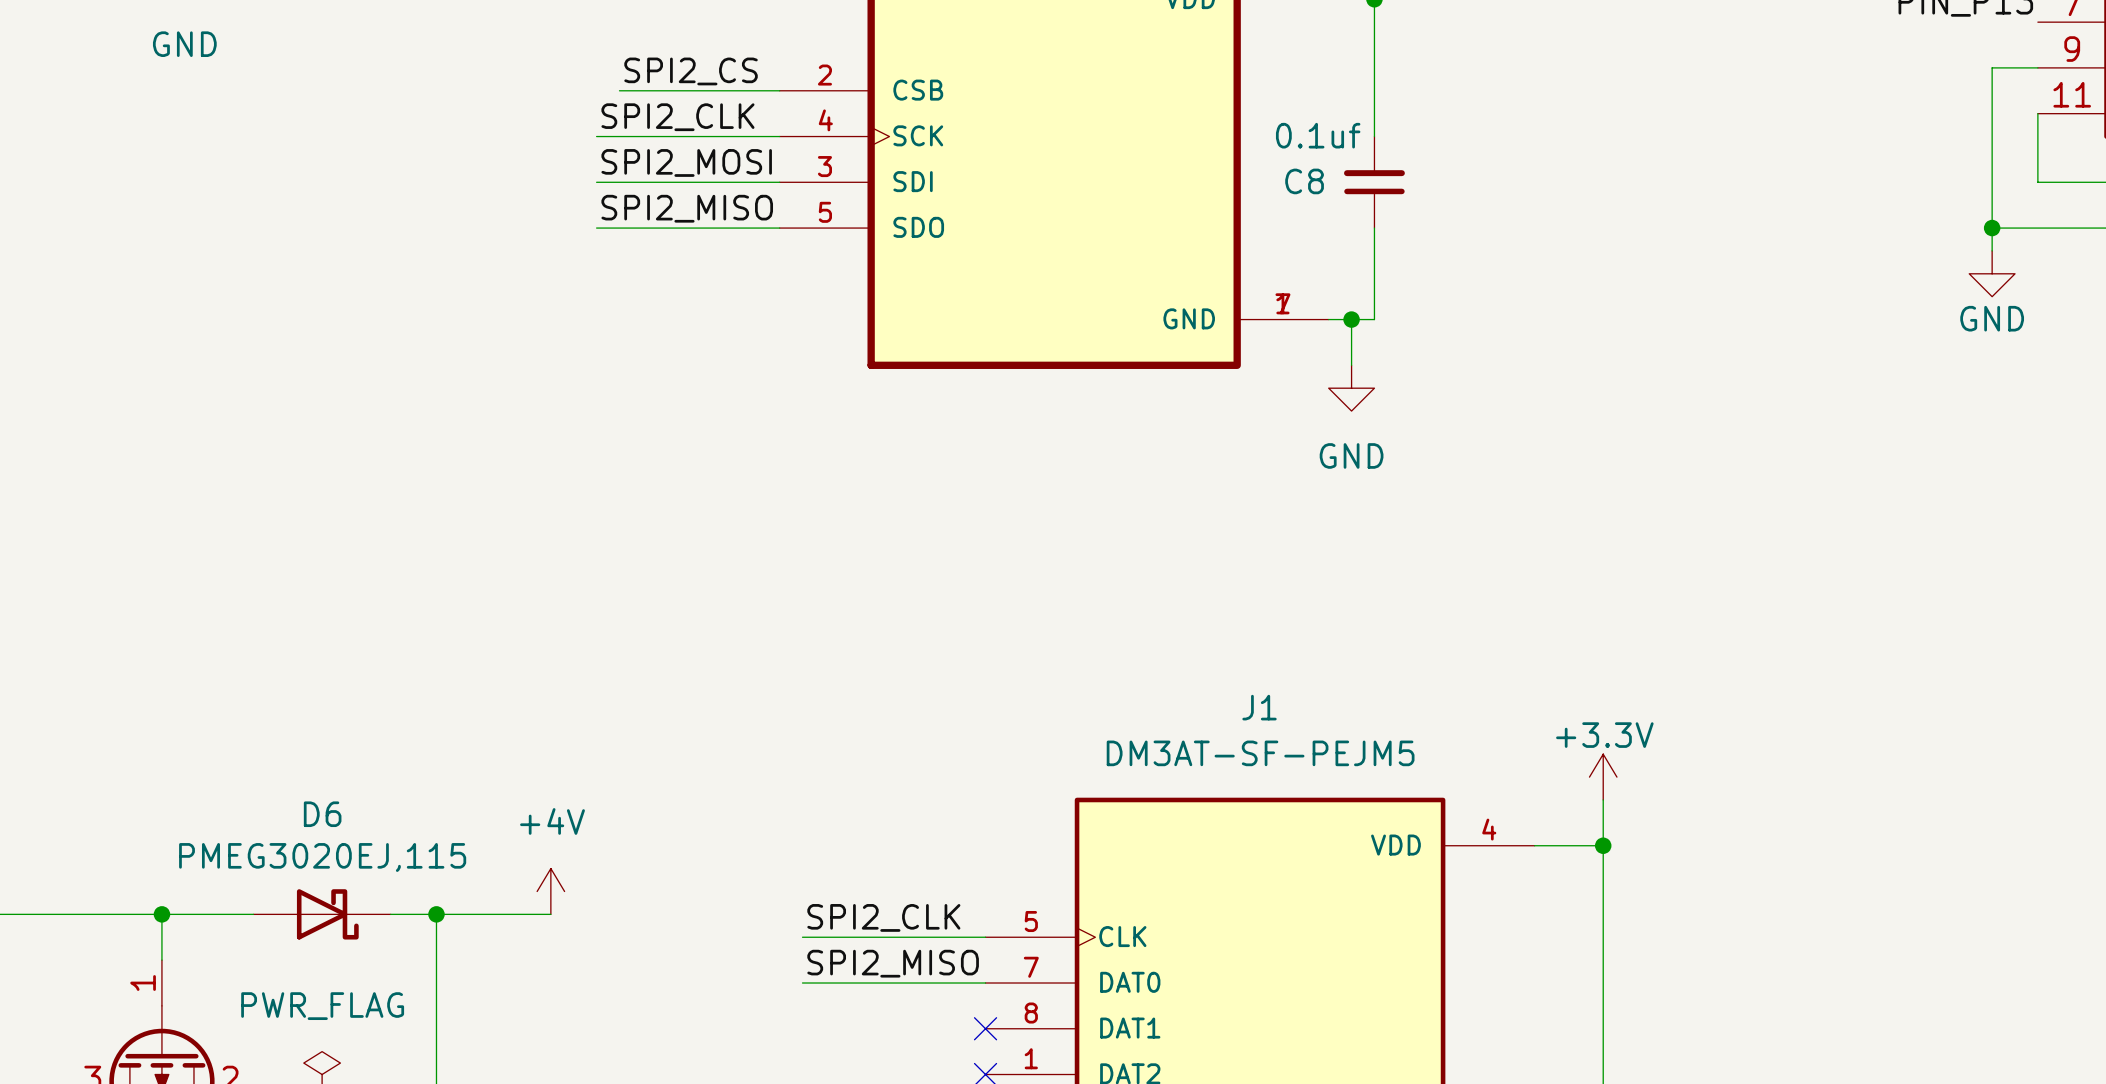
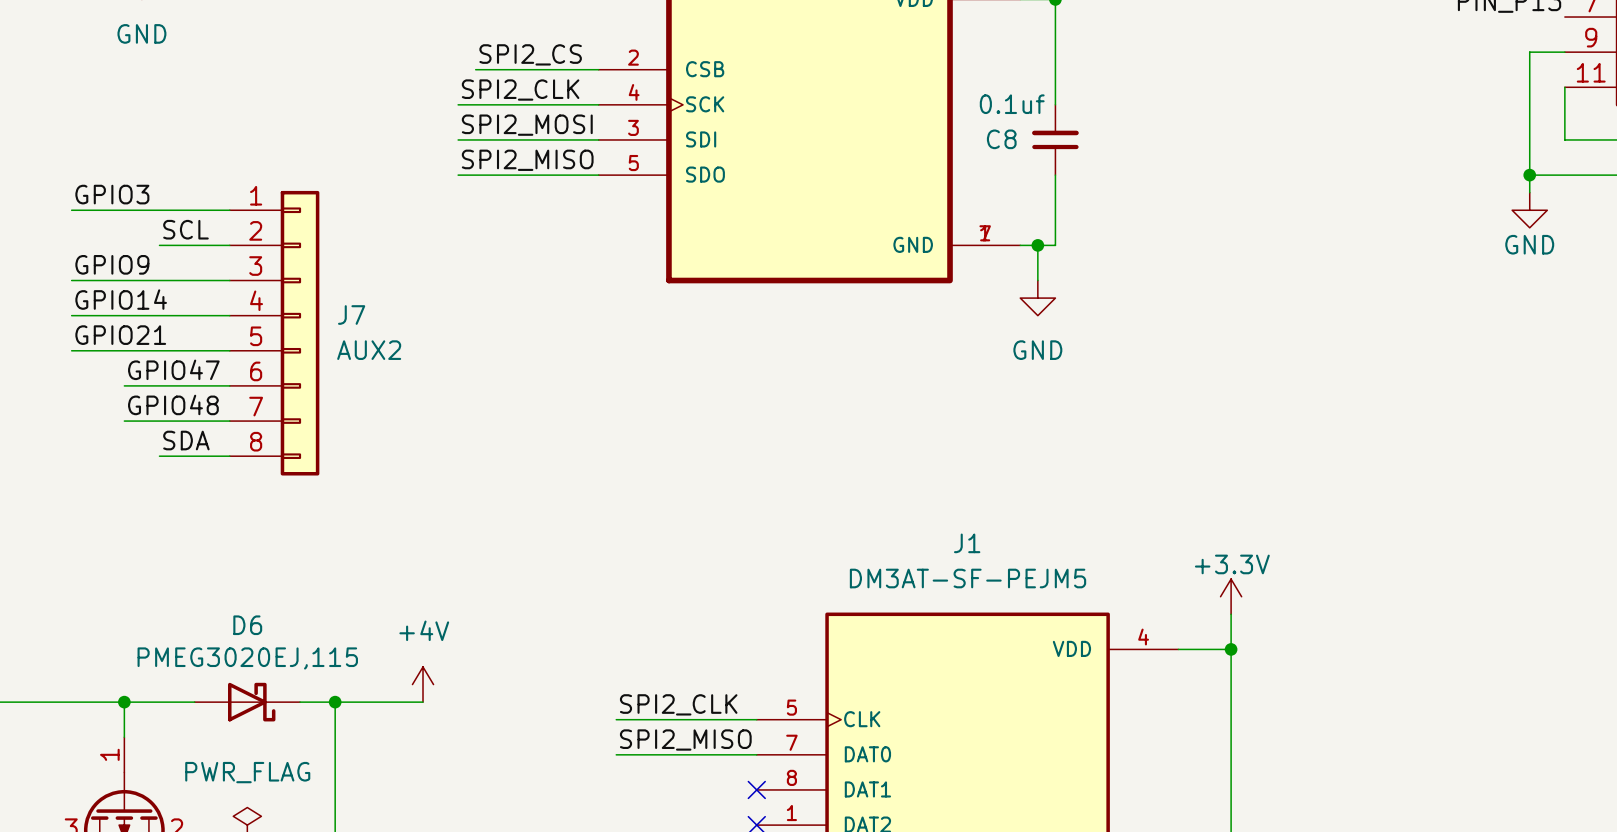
label: none -> GPIO3 (112, 194)
wire: none -> (71, 210) (229, 210)
label: none -> SCL (185, 229)
wire: none -> (159, 245) (229, 245)
label: none -> GPIO9 (112, 264)
wire: none -> (71, 280) (229, 280)
label: none -> GPIO14 (121, 299)
wire: none -> (71, 315) (229, 315)
J7: none -> AUX2 (274, 333)
label: none -> GPIO21 (120, 335)
wire: none -> (71, 350) (229, 350)
label: none -> GPIO47 (173, 369)
wire: none -> (124, 385) (229, 385)
label: none -> GPIO48 (173, 404)
wire: none -> (124, 421) (229, 421)
label: none -> SDA (186, 440)
wire: none -> (159, 456) (229, 456)

